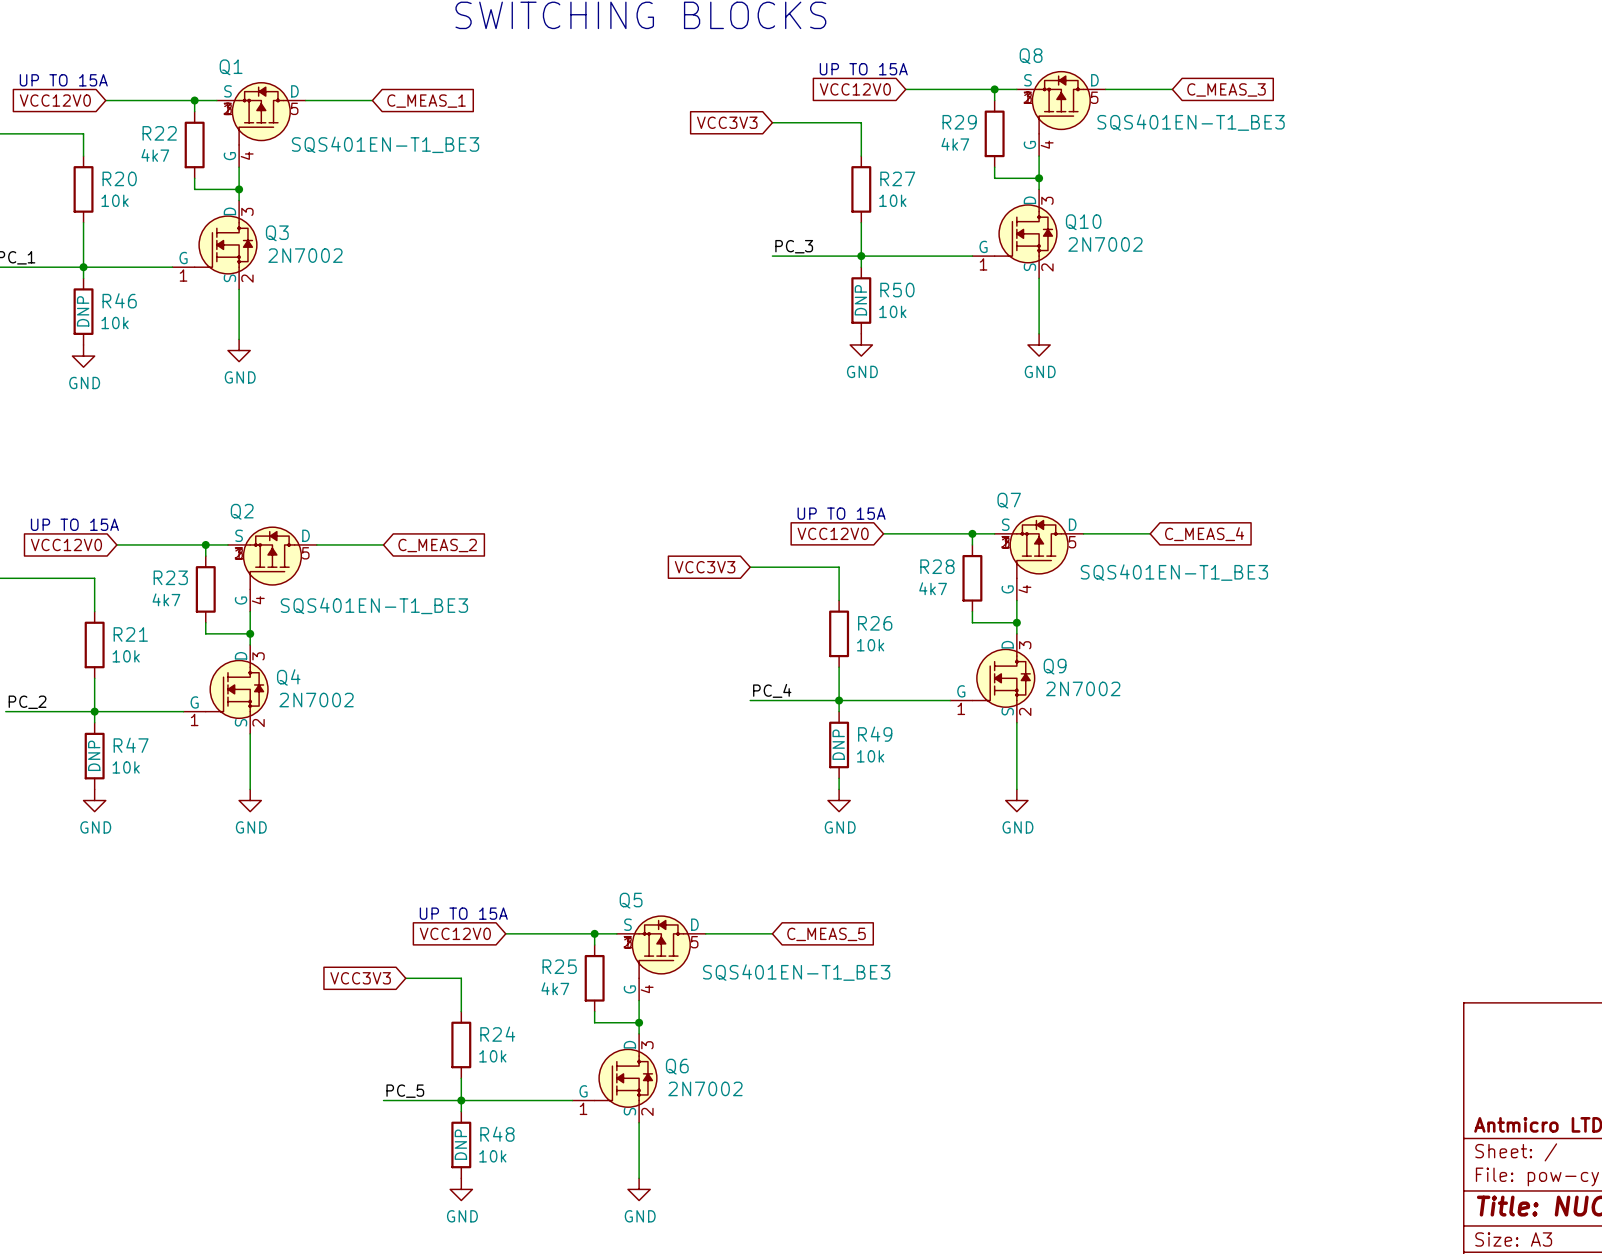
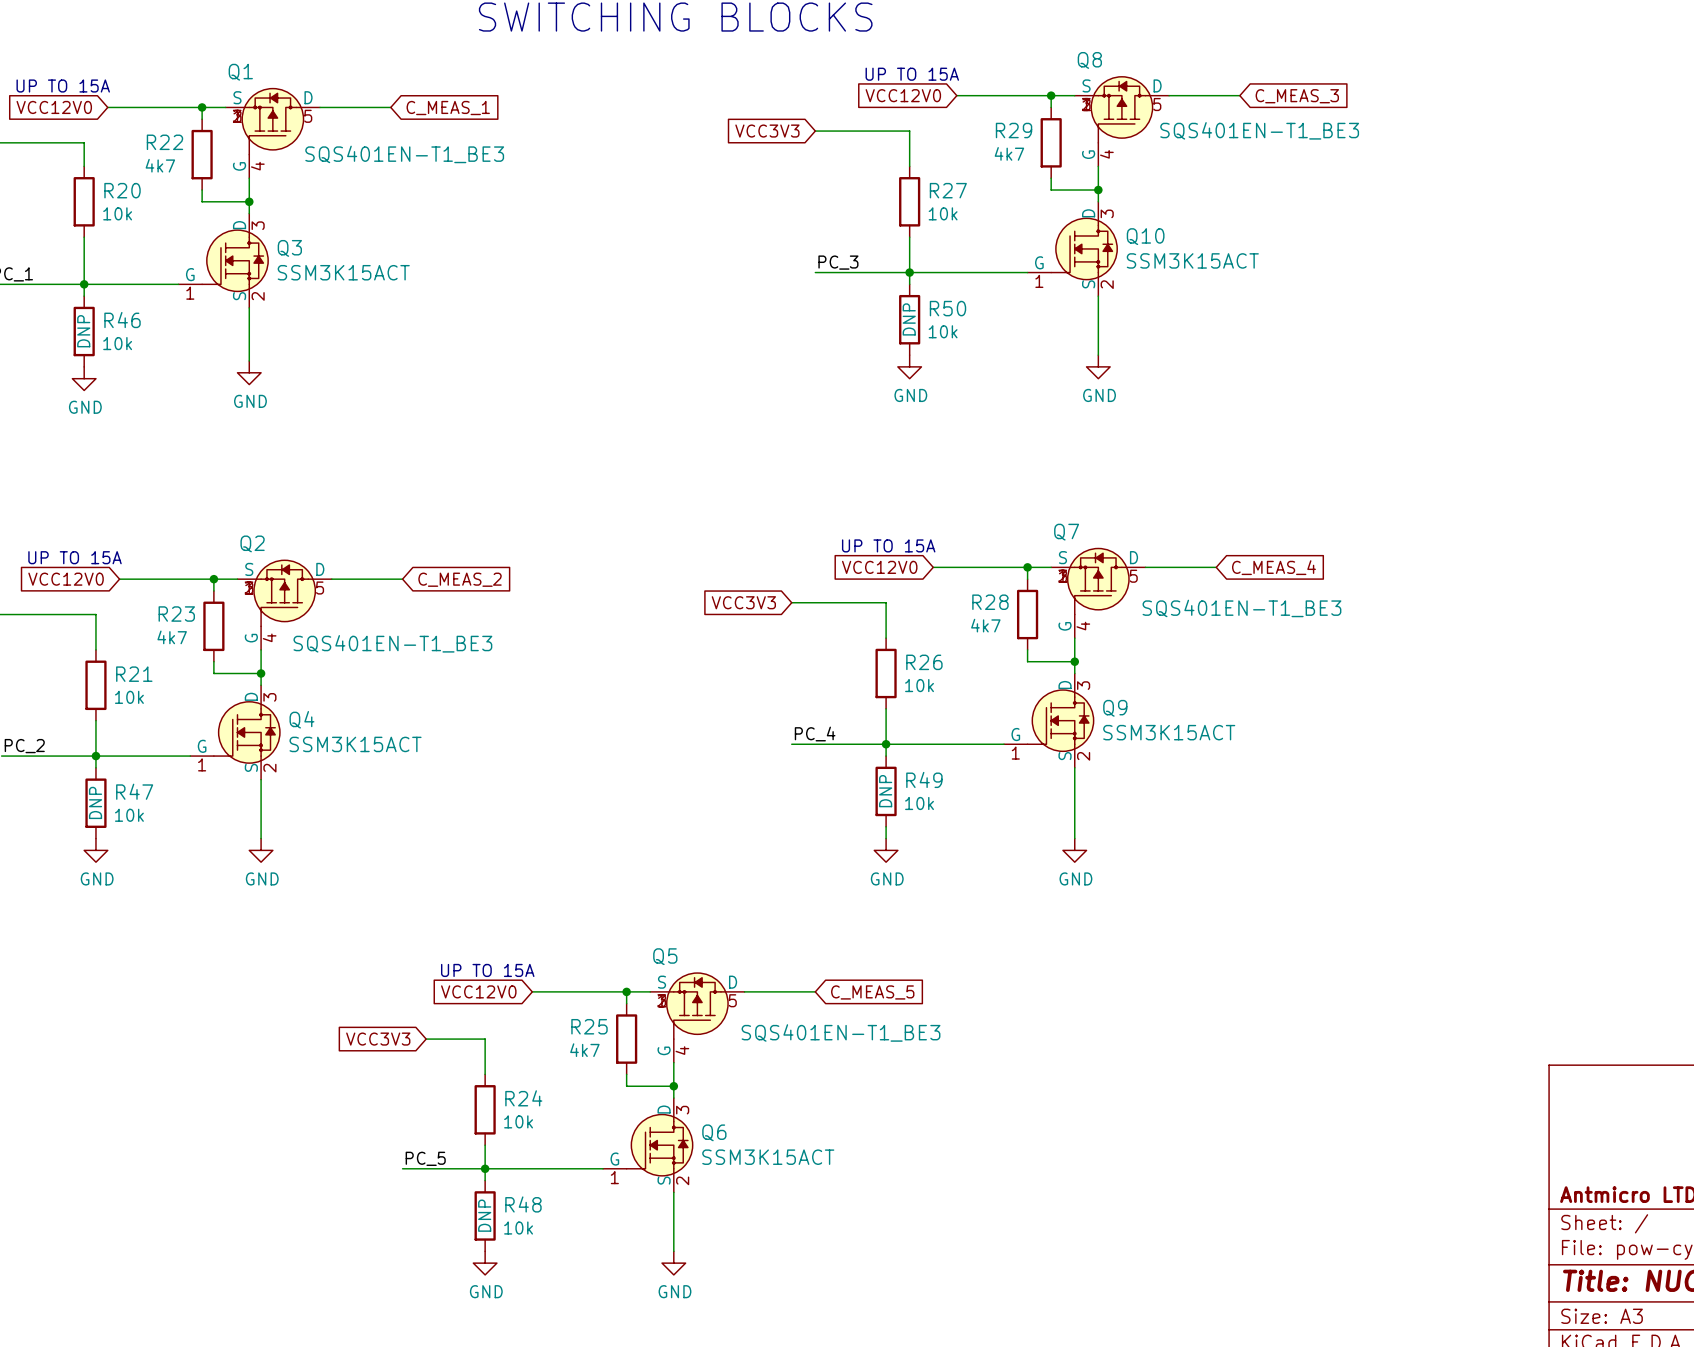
Q10 value: 2N7002 (1105, 244) -> SSM3K15ACT (1192, 260)
Q3 value: 2N7002 (305, 255) -> SSM3K15ACT (343, 272)
Q9 value: 2N7002 (1083, 688) -> SSM3K15ACT (1169, 732)
Q4 value: 2N7002 (316, 700) -> SSM3K15ACT (355, 744)
Q6 value: 2N7002 (705, 1088) -> SSM3K15ACT (768, 1157)

